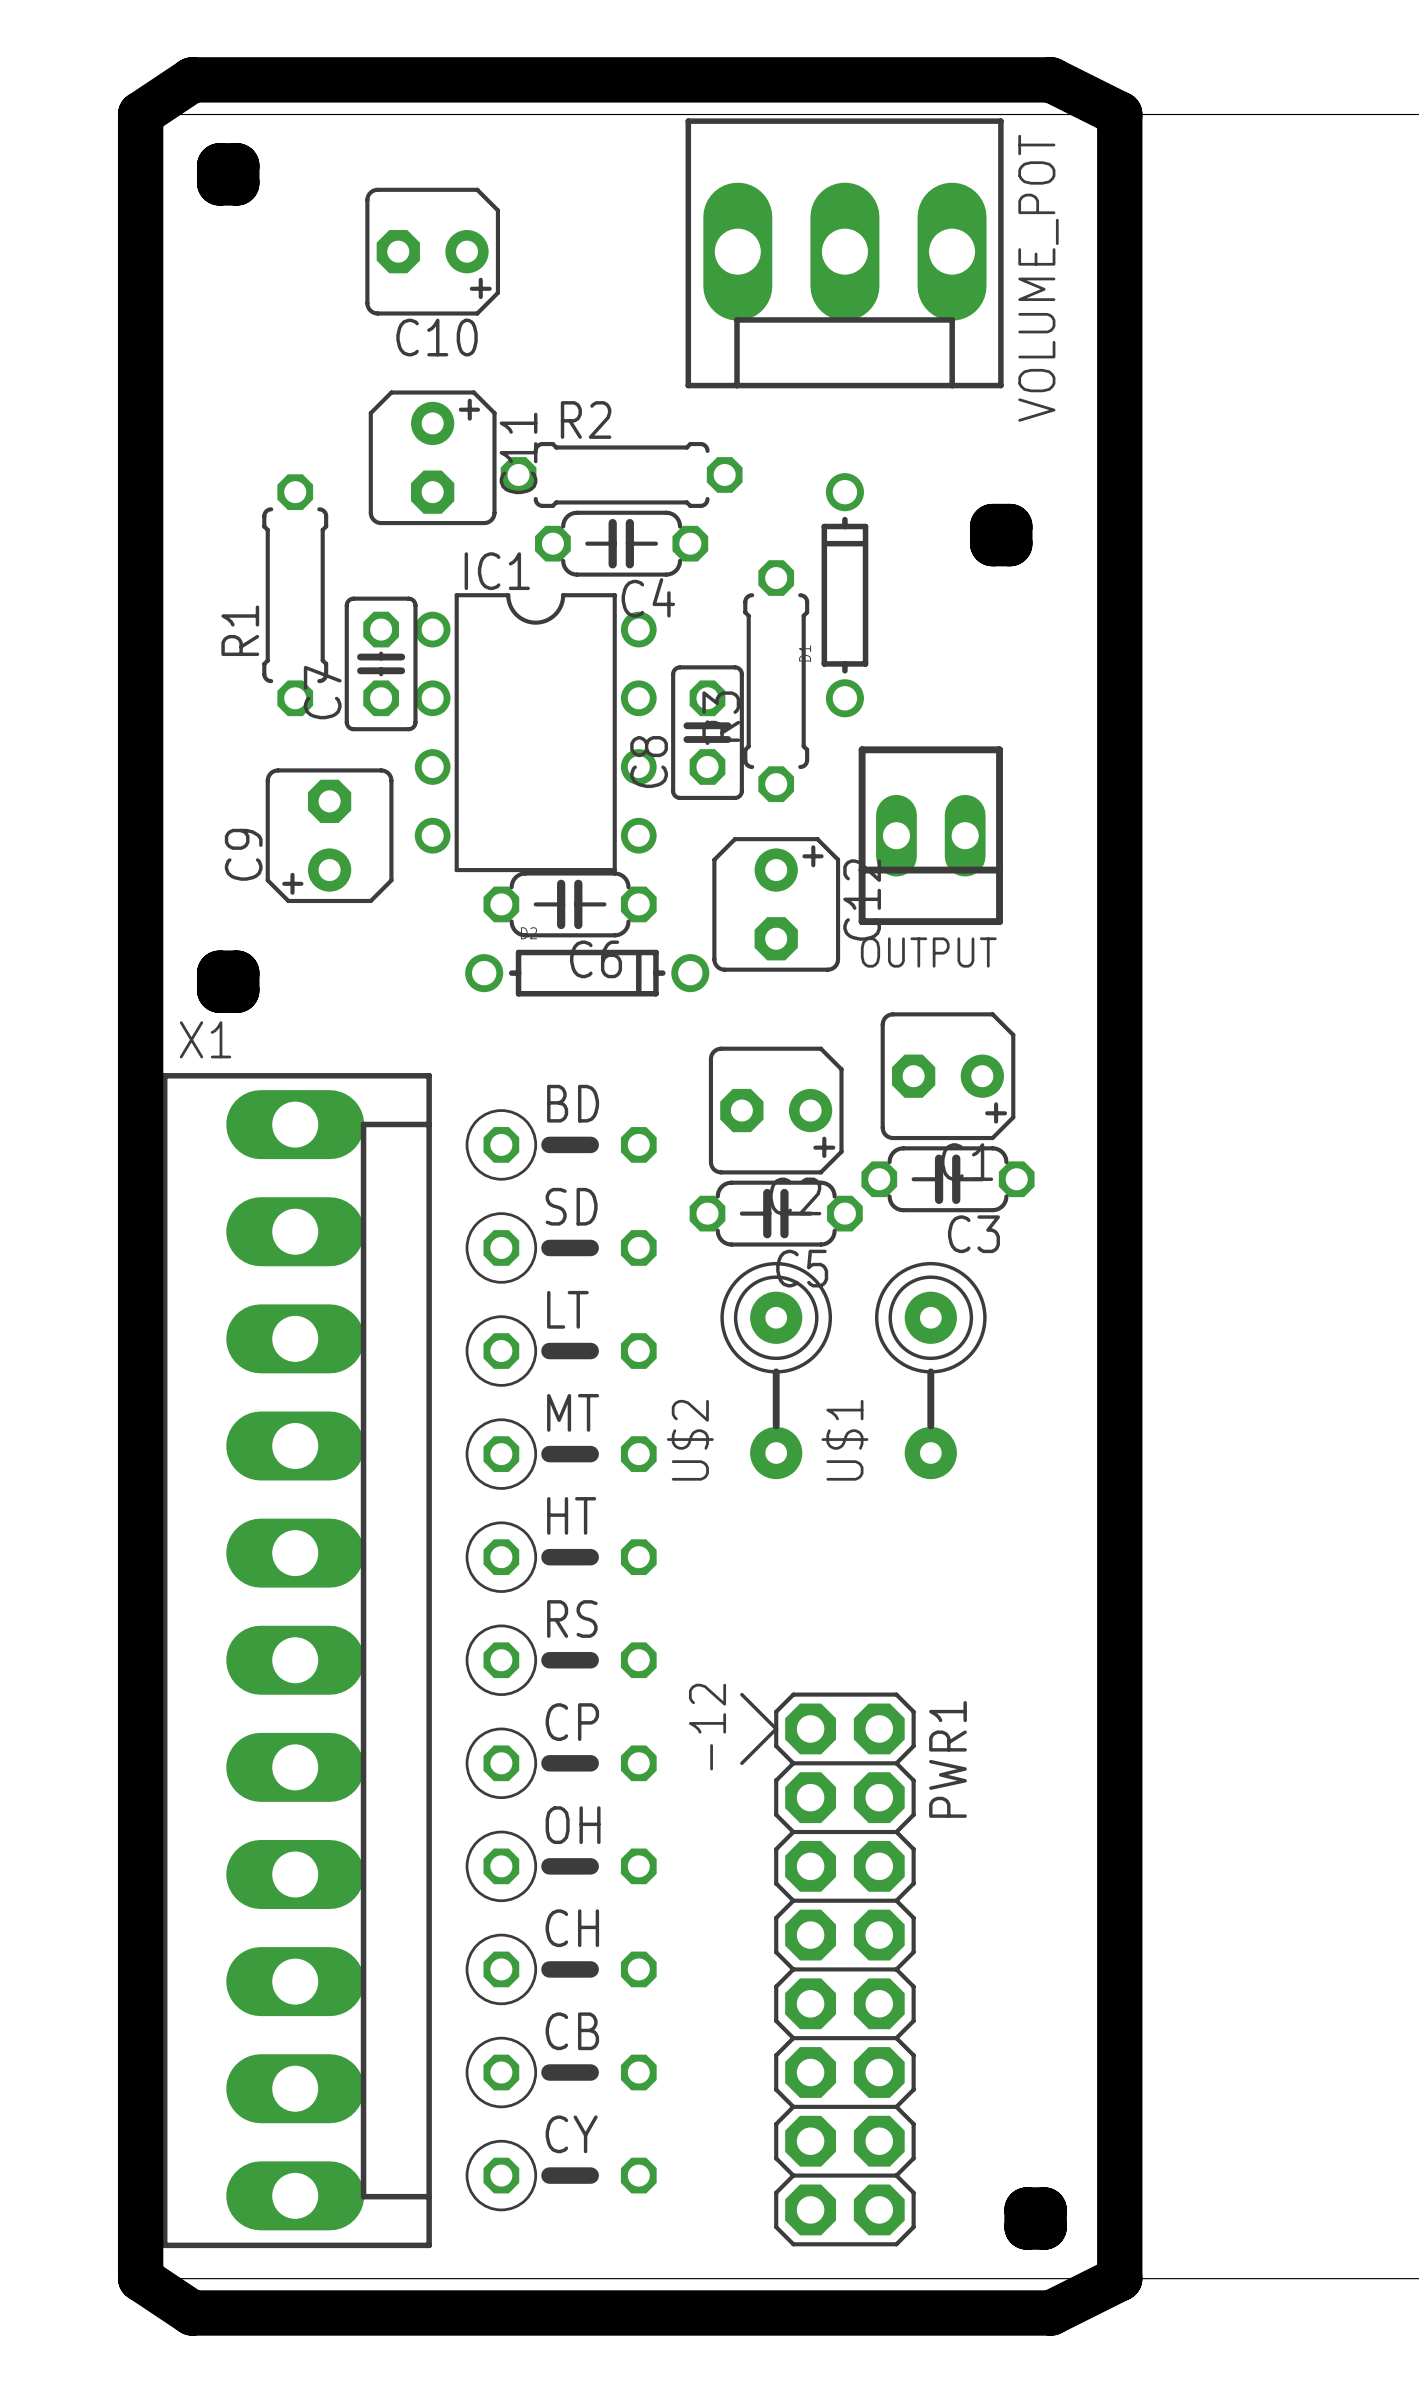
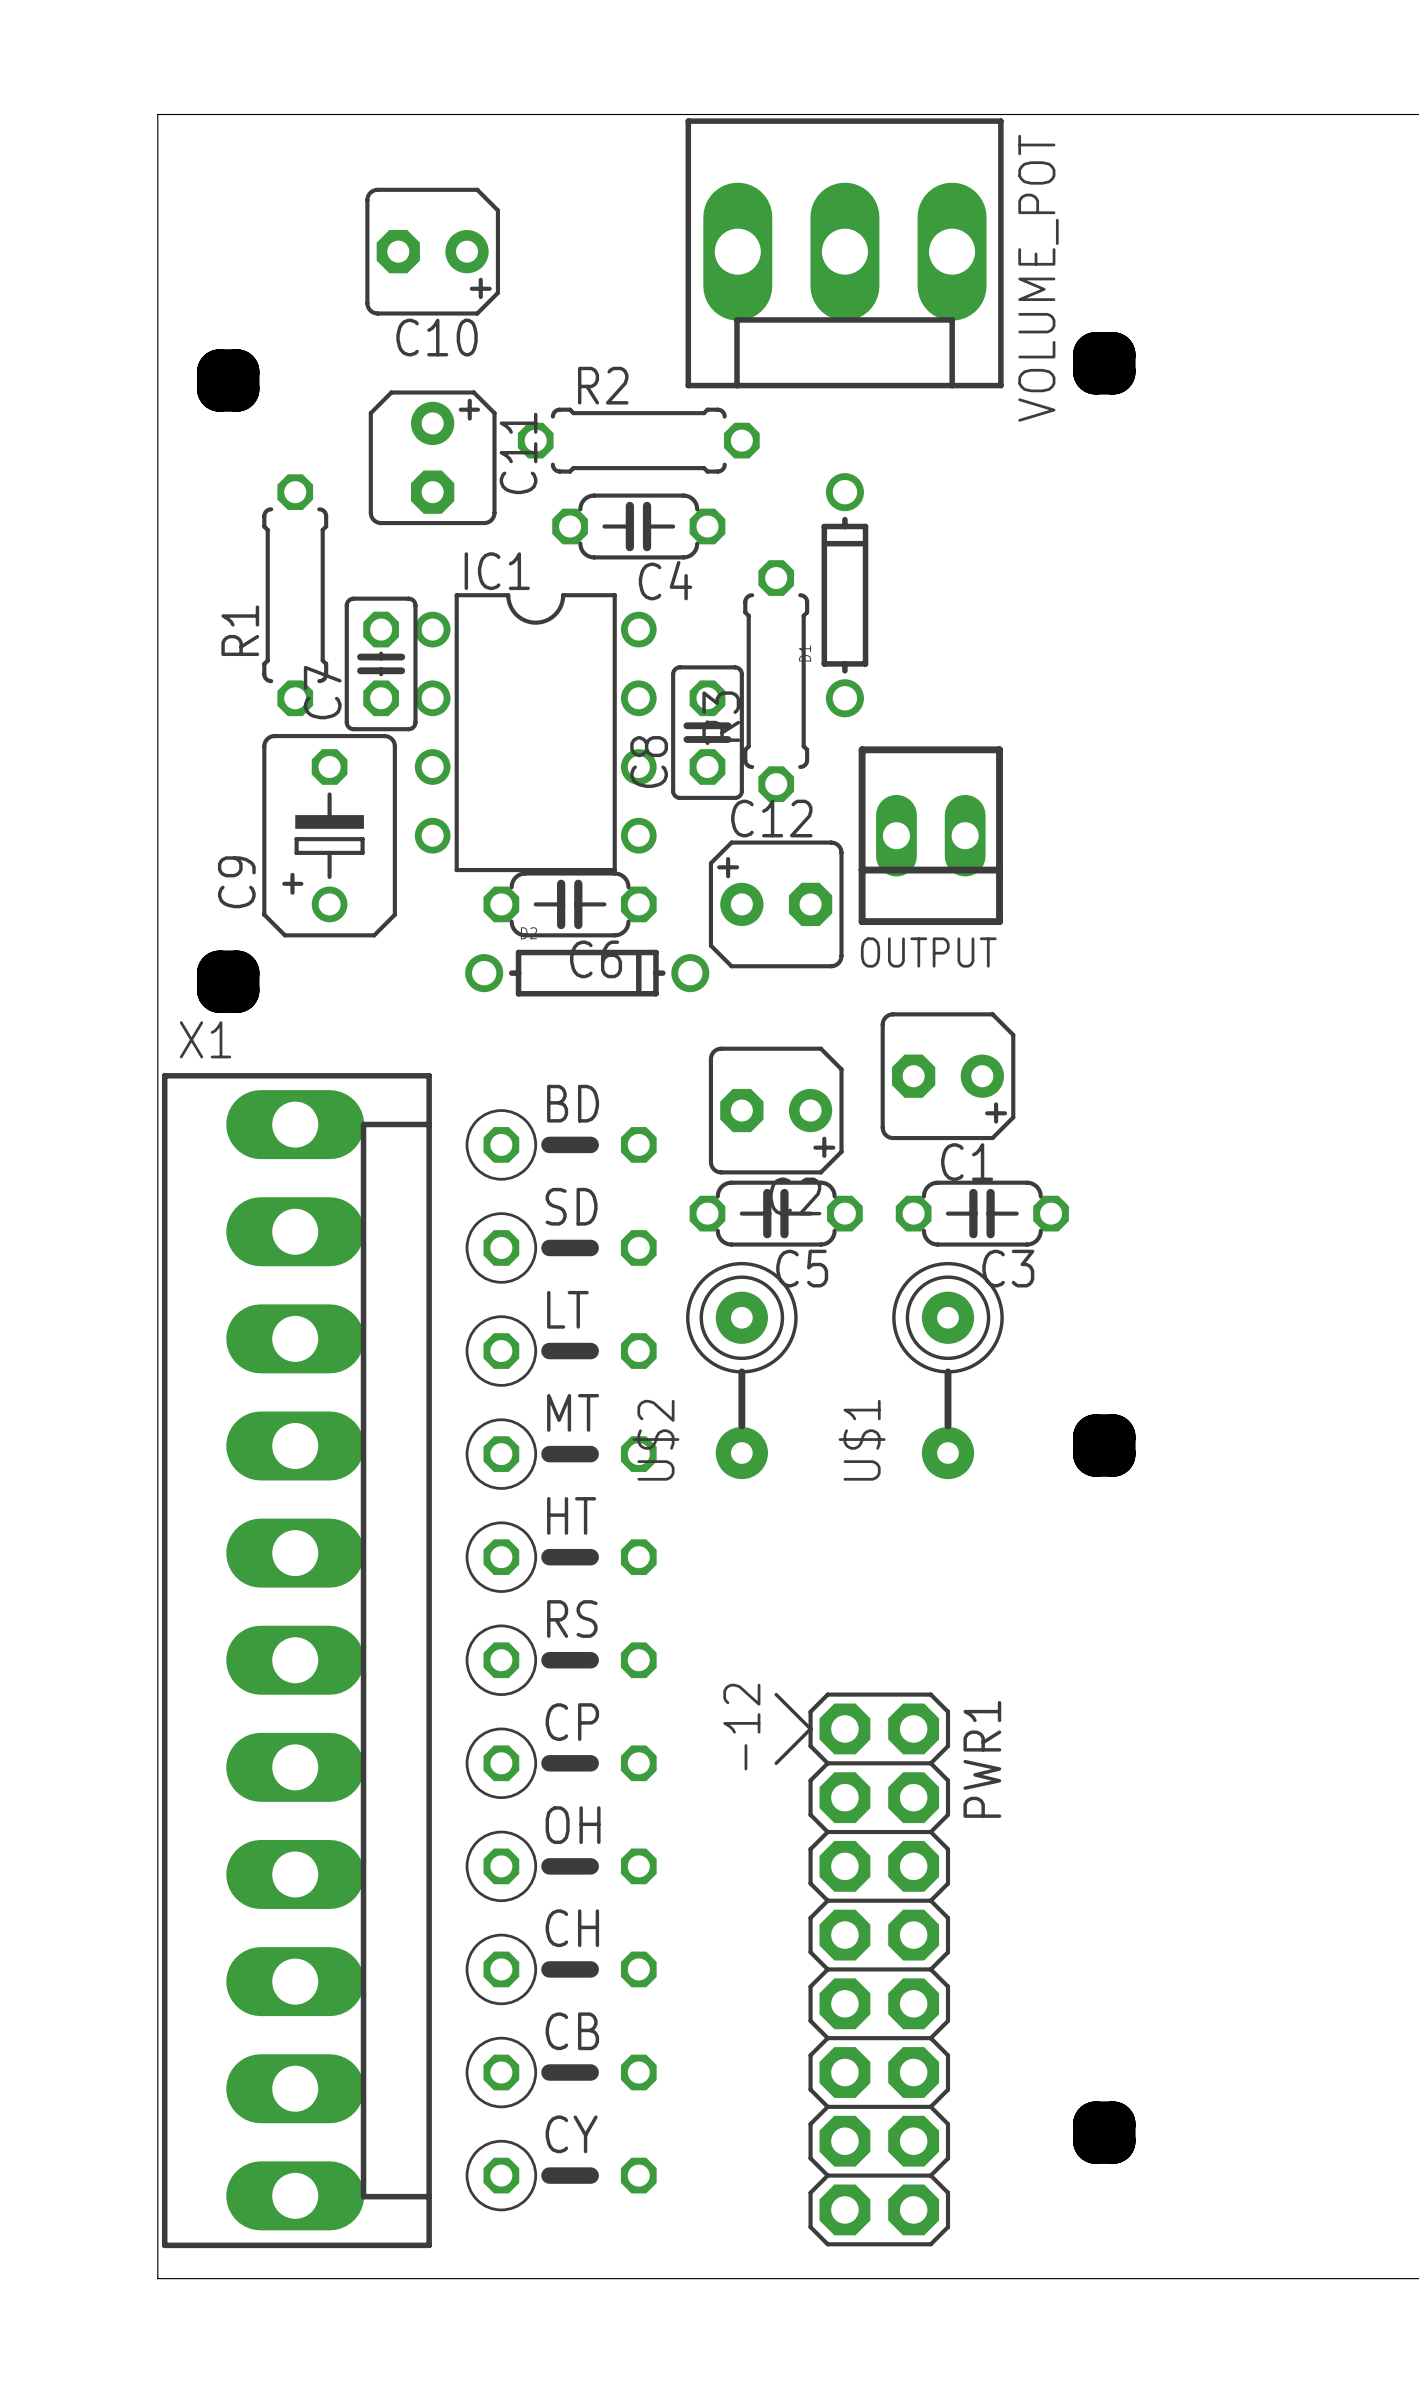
board edge: (192, 79) (140, 114) (140, 2278) (192, 2312) (1051, 2312) (1119, 2278) (1119, 114) (1051, 79) (192, 79) -> none
board edge: (219, 165) (219, 182) (236, 182) (236, 165) (219, 165) -> (219, 371) (219, 389) (236, 389) (236, 371) (219, 371)
R2 position: (621, 474) -> (638, 440)
board edge: (992, 526) (992, 543) (1009, 543) (1009, 526) (992, 526) -> (1095, 354) (1095, 371) (1112, 371) (1112, 354) (1095, 354)
C4 position: (621, 543) -> (638, 526)
C9 footprint: [265, 768, 394, 904] -> [262, 734, 397, 938]
C12 rotation: 0° (776, 904) -> 90° counterclockwise (776, 904)
C3 position: (947, 1179) -> (982, 1213)
U$2 position: (776, 1370) -> (741, 1370)
U$1 position: (930, 1370) -> (947, 1370)
board edge: none -> (1095, 1436) (1095, 1454) (1112, 1454) (1112, 1436) (1095, 1436)
PWR1 position: (827, 1969) -> (862, 1969)
board edge: (1027, 2209) (1027, 2227) (1044, 2227) (1044, 2209) (1027, 2209) -> (1095, 2124) (1095, 2141) (1112, 2141) (1112, 2124) (1095, 2124)

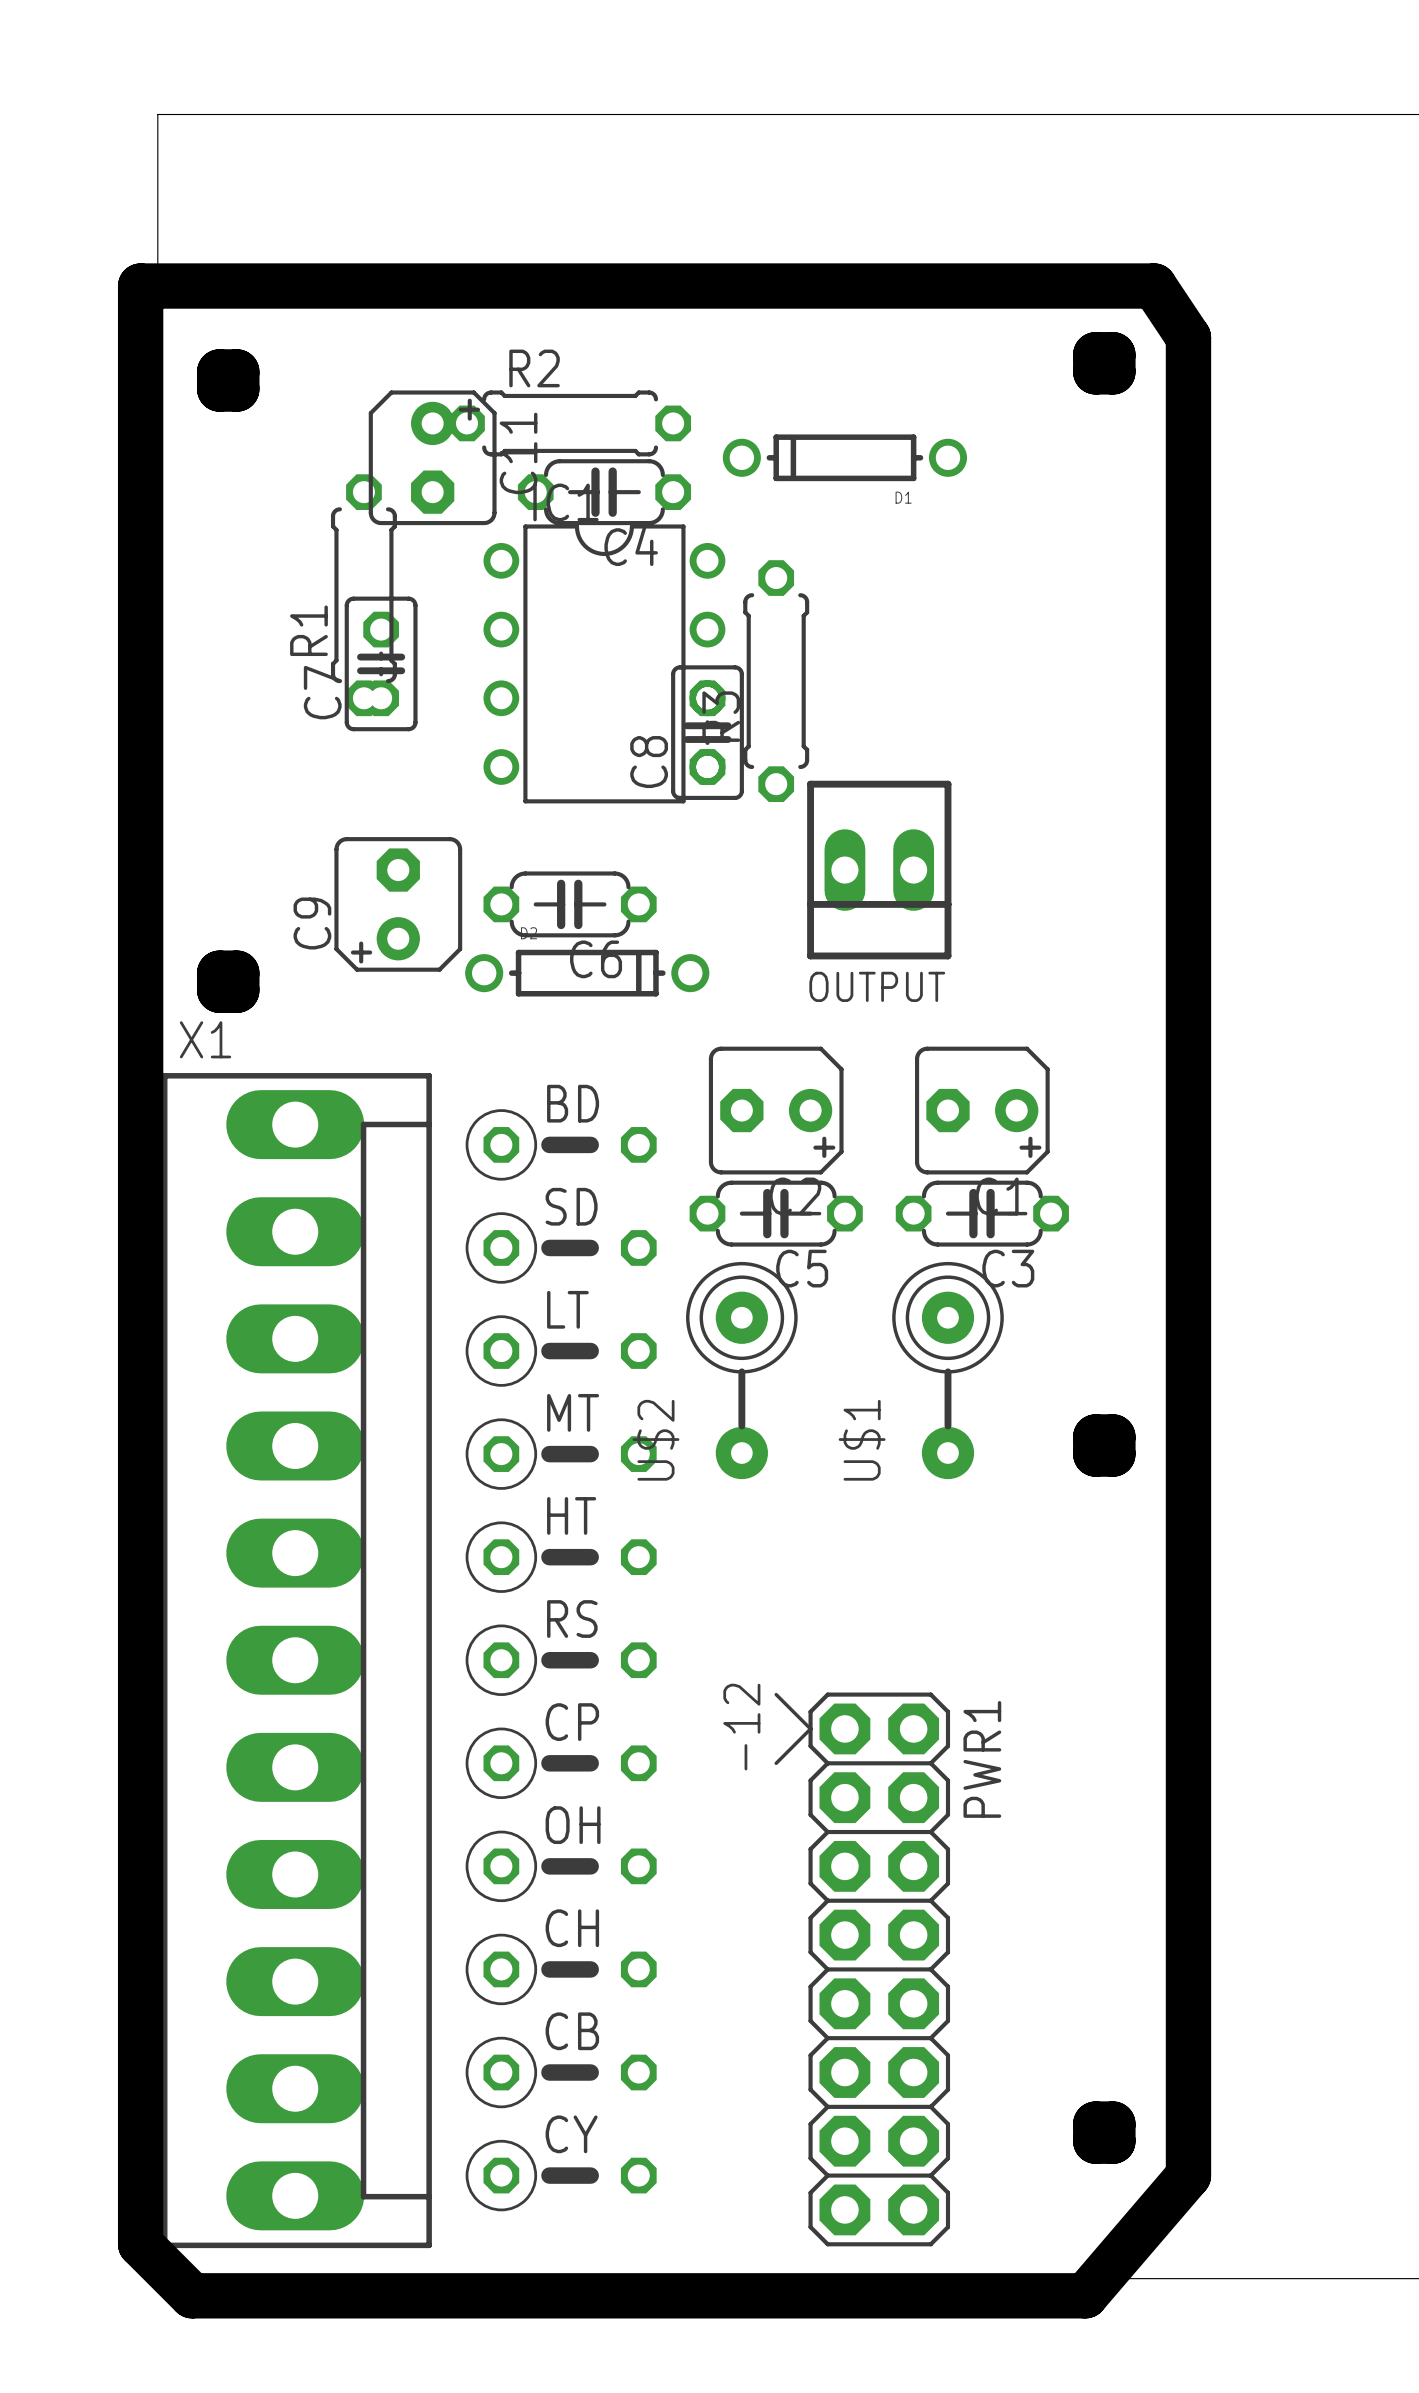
C10: (432, 251) -> none
VOLUME_POT: (844, 253) -> none
board edge: none -> (140, 286) (1154, 286) (1188, 337) (1188, 2175) (1085, 2295) (192, 2295) (140, 2244) (140, 286)
R2 position: (638, 440) -> (570, 423)
C4 position: (638, 526) -> (604, 492)
R1 position: (295, 595) -> (363, 595)
D1 rotation: 0° (844, 595) -> 90° counterclockwise (844, 457)
IC1 position: (535, 732) -> (604, 663)
C9 footprint: [262, 734, 397, 938] -> [334, 837, 463, 972]
OUTPUT position: (930, 835) -> (879, 870)
C12: (776, 904) -> none
C1 position: (947, 1076) -> (982, 1110)

